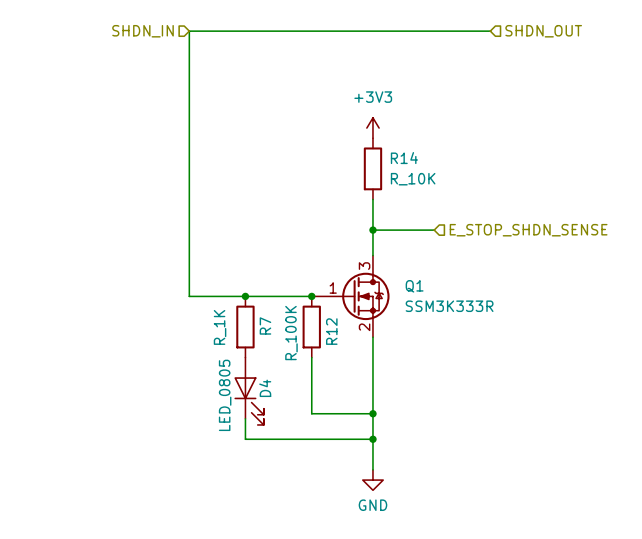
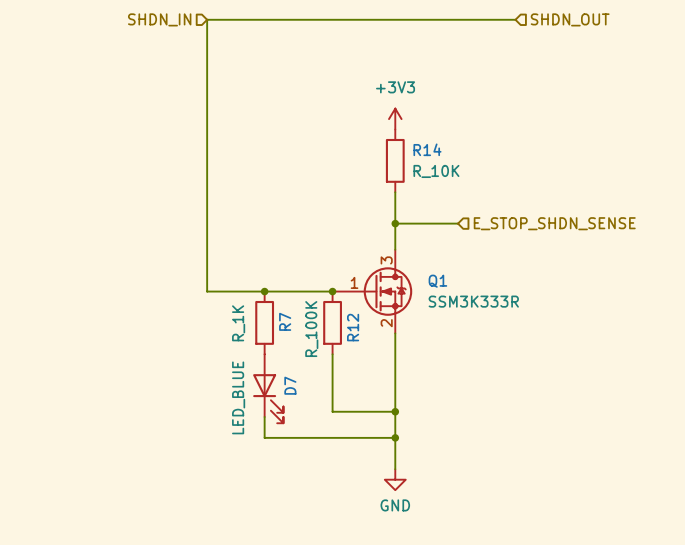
D4: LED_0805 (249, 391) -> none
D7: none -> LED_BLUE (268, 388)

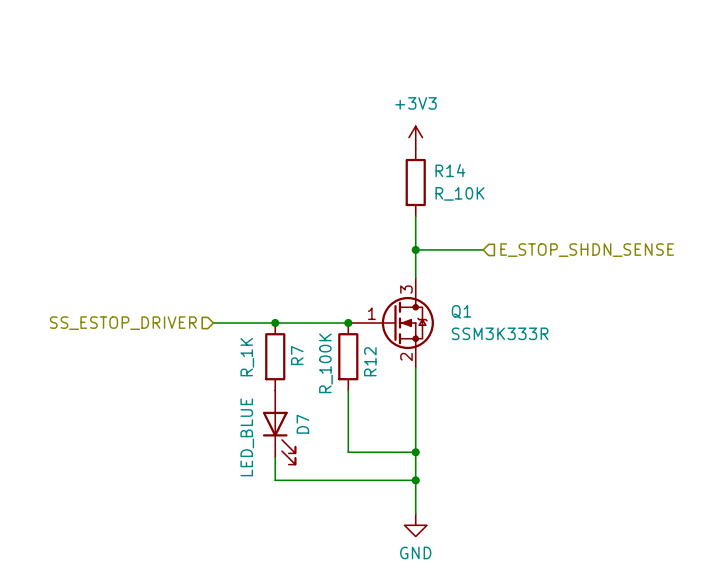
hierarchical label: SHDN_IN (159, 19) -> none
wire: (515, 19) (207, 19) (207, 291) -> none
hierarchical label: SHDN_OUT (570, 19) -> none
hierarchical label: none -> SS_ESTOP_DRIVER (123, 323)

